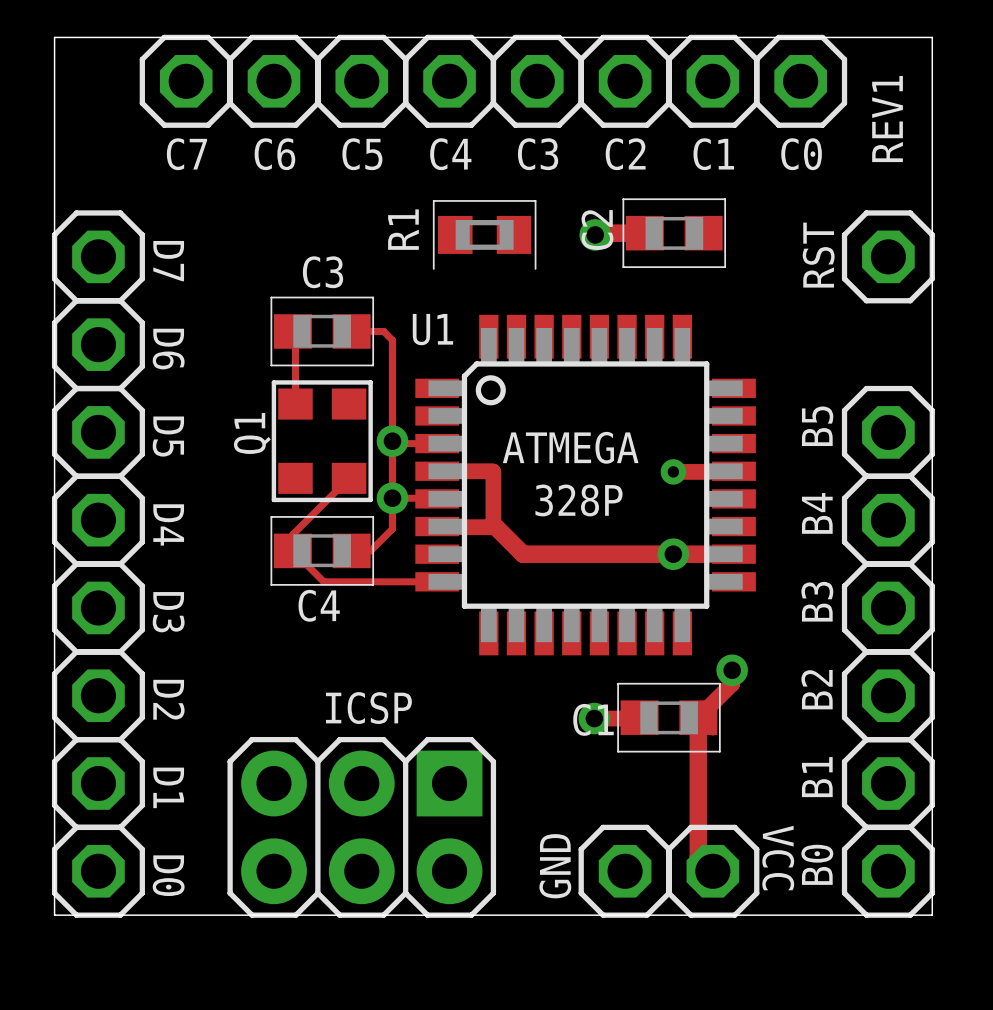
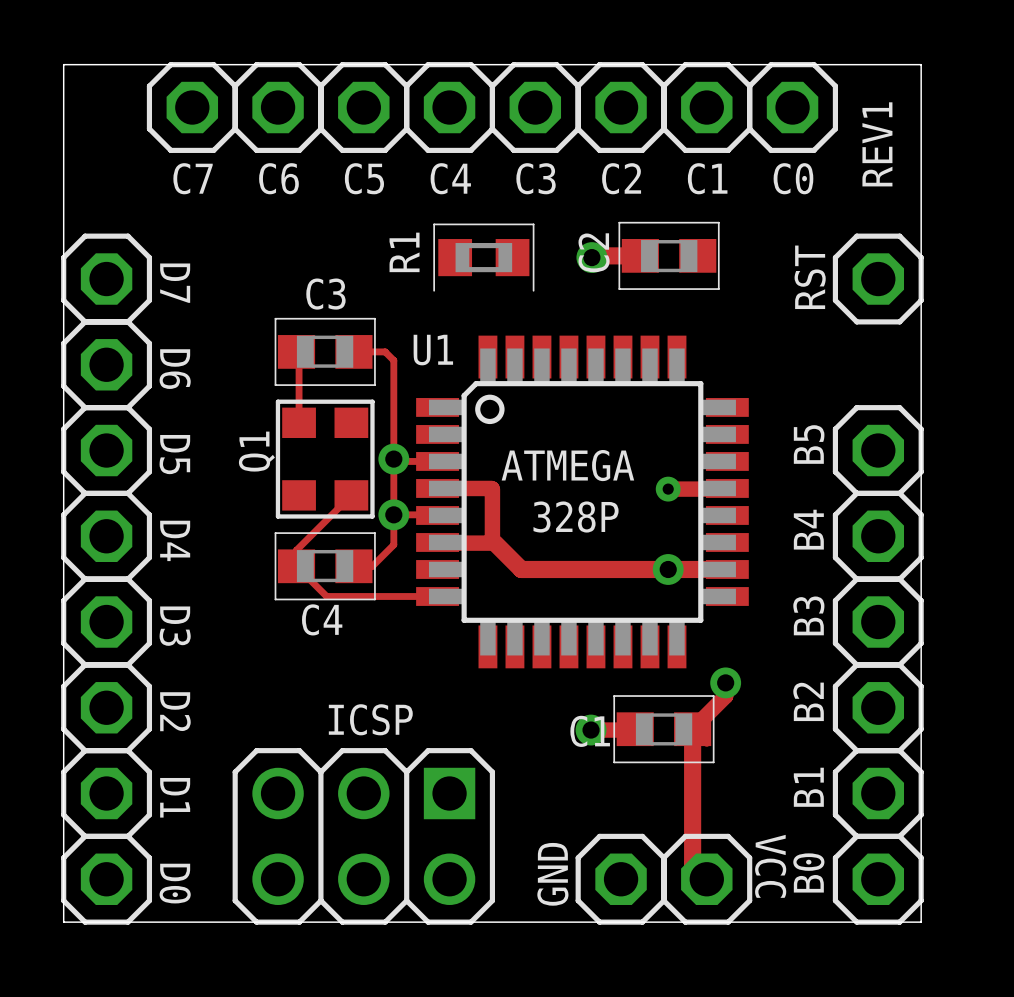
part footprint: [227, 736, 497, 918] -> [232, 748, 496, 925]

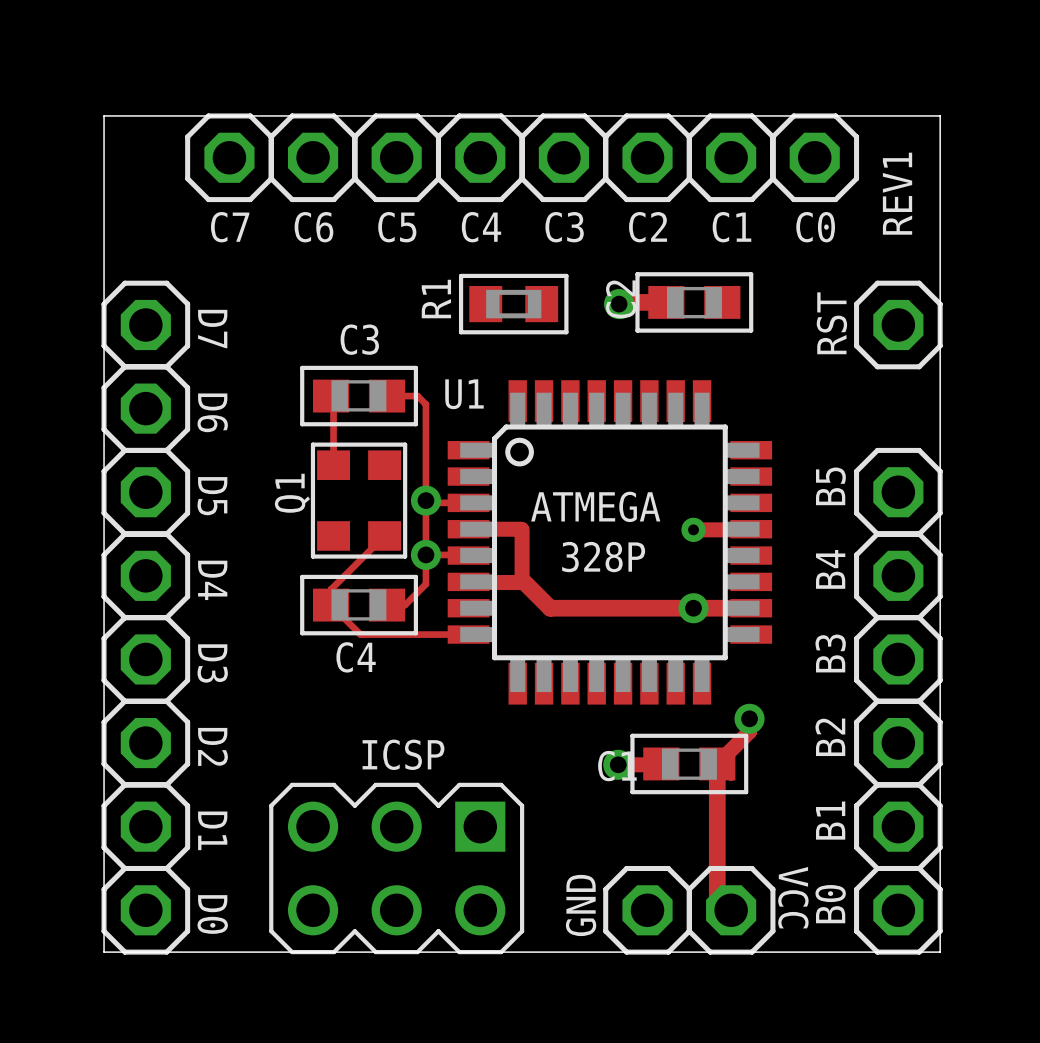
C2 footprint: [618, 221, 720, 290] -> [635, 272, 754, 333]
R1 footprint: [433, 223, 535, 292] -> [458, 273, 569, 335]
C3 footprint: [274, 317, 376, 386] -> [300, 365, 418, 427]
C4 footprint: [274, 532, 376, 601] -> [300, 574, 418, 636]
C1 footprint: [613, 695, 715, 764] -> [630, 733, 749, 795]
part footprint: [232, 748, 496, 925] -> [269, 782, 525, 955]

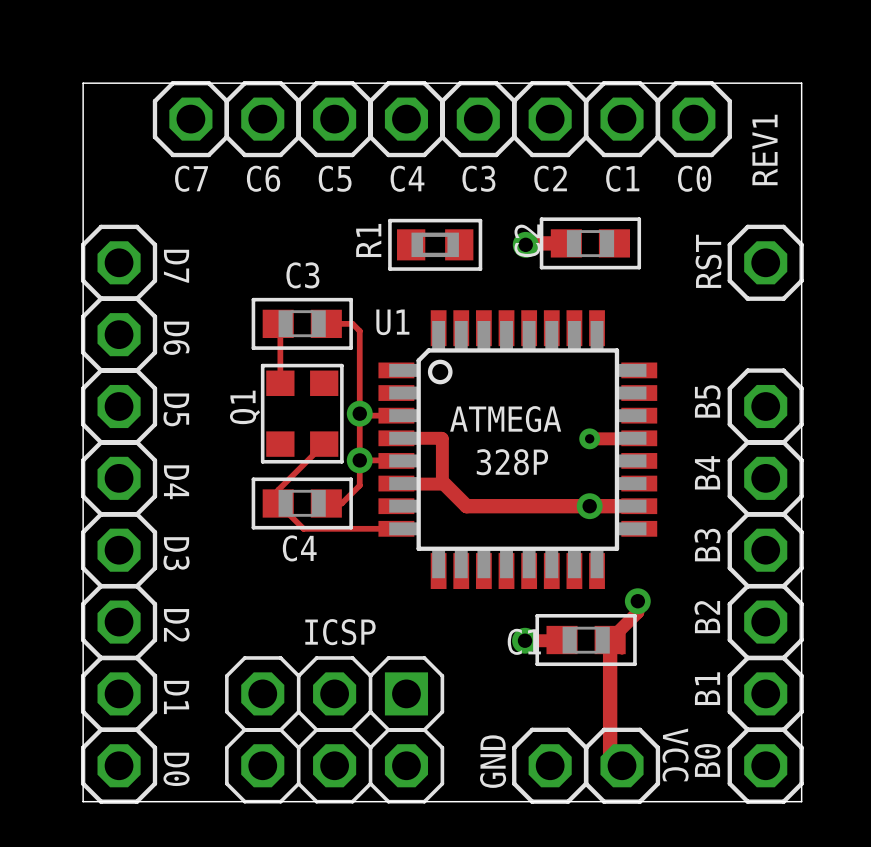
part footprint: [269, 782, 525, 955] -> [225, 656, 445, 804]

